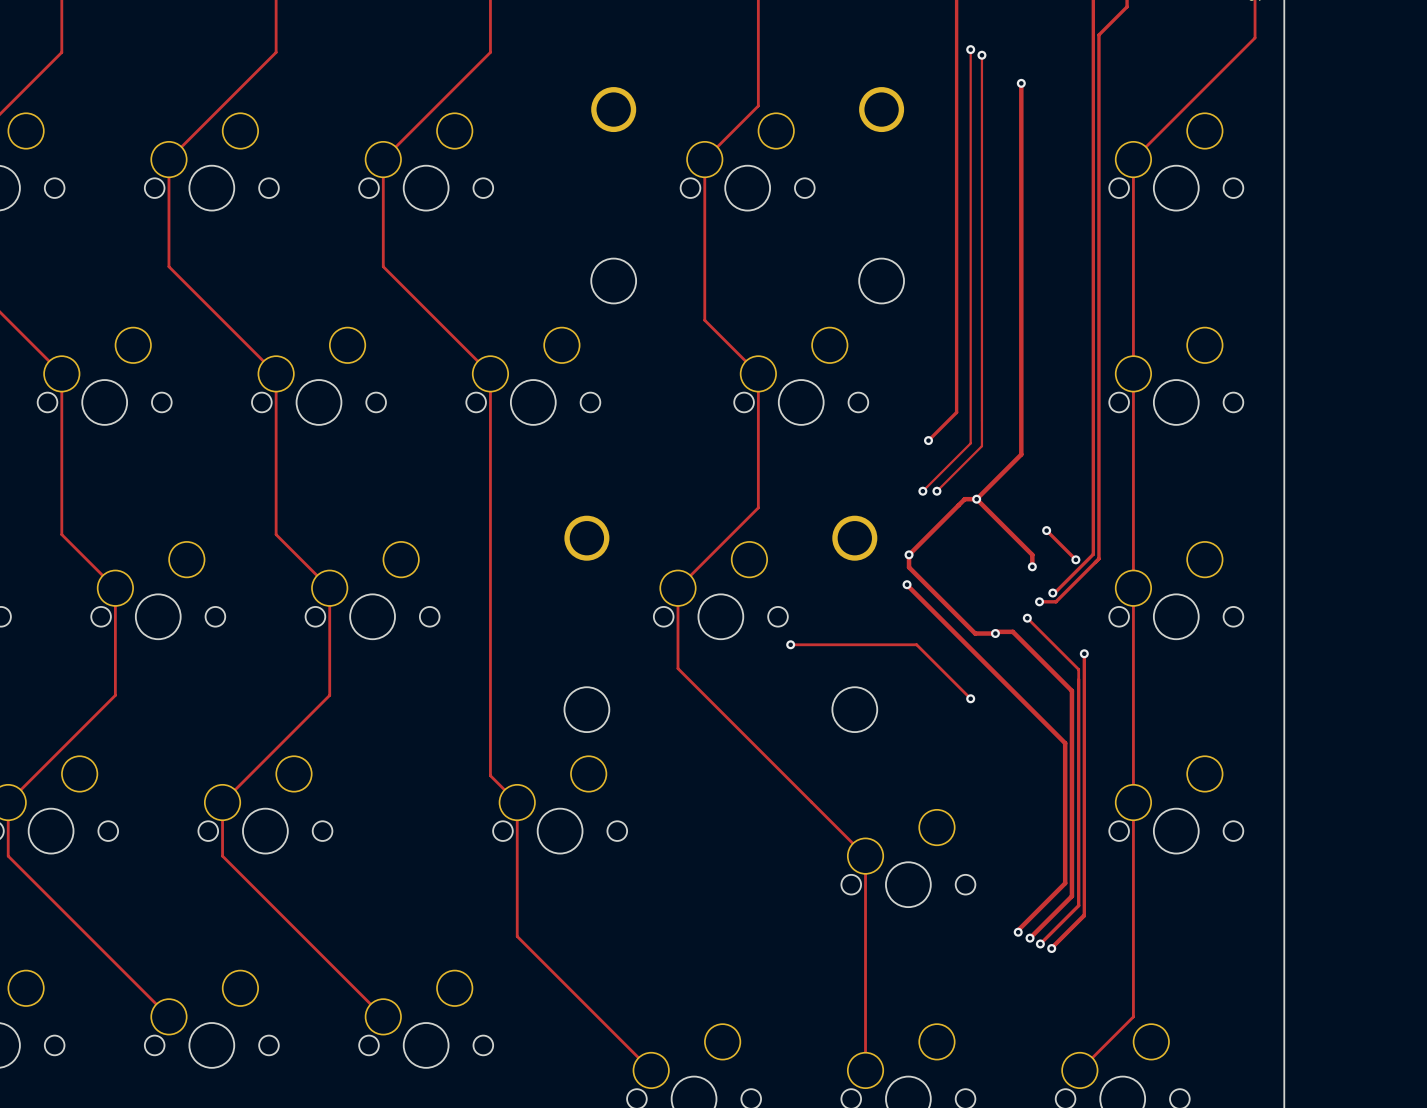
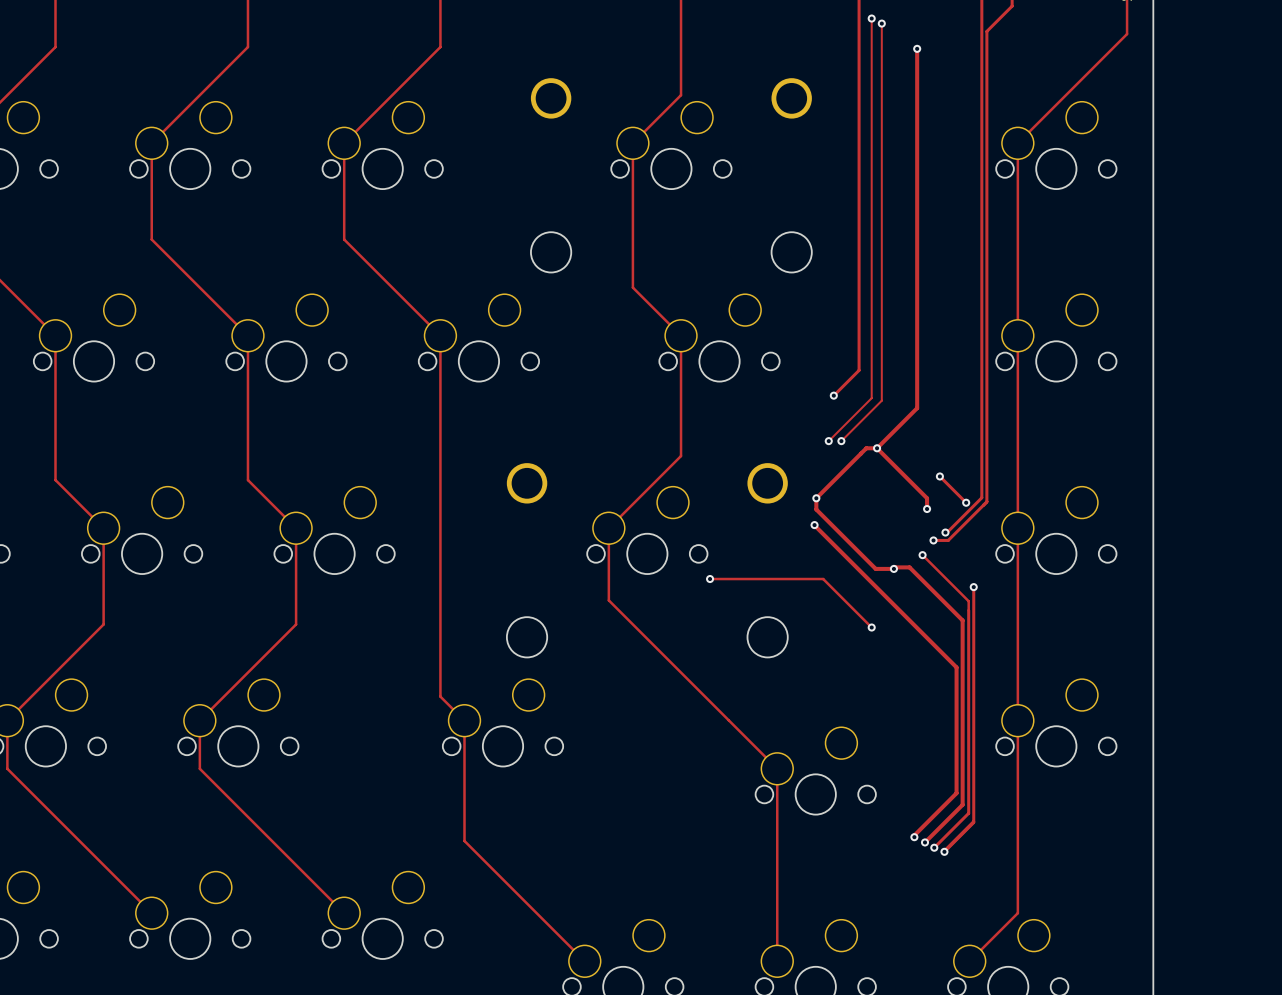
track: none -> (871, 18) (871, 44)
via: none -> (871, 18)
track: none -> (881, 23) (881, 49)
via: none -> (881, 23)
via: (970, 49) -> none
track: none -> (917, 48) (917, 74)
via: none -> (917, 48)
via: (981, 55) -> none
via: (1021, 83) -> none

